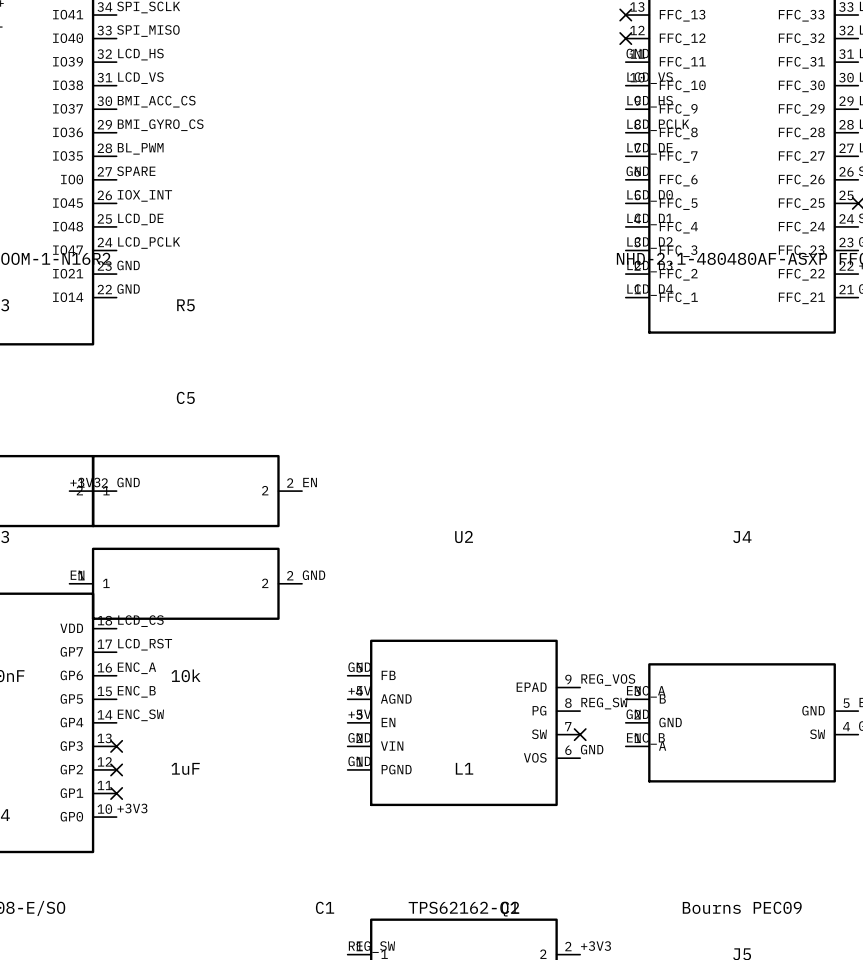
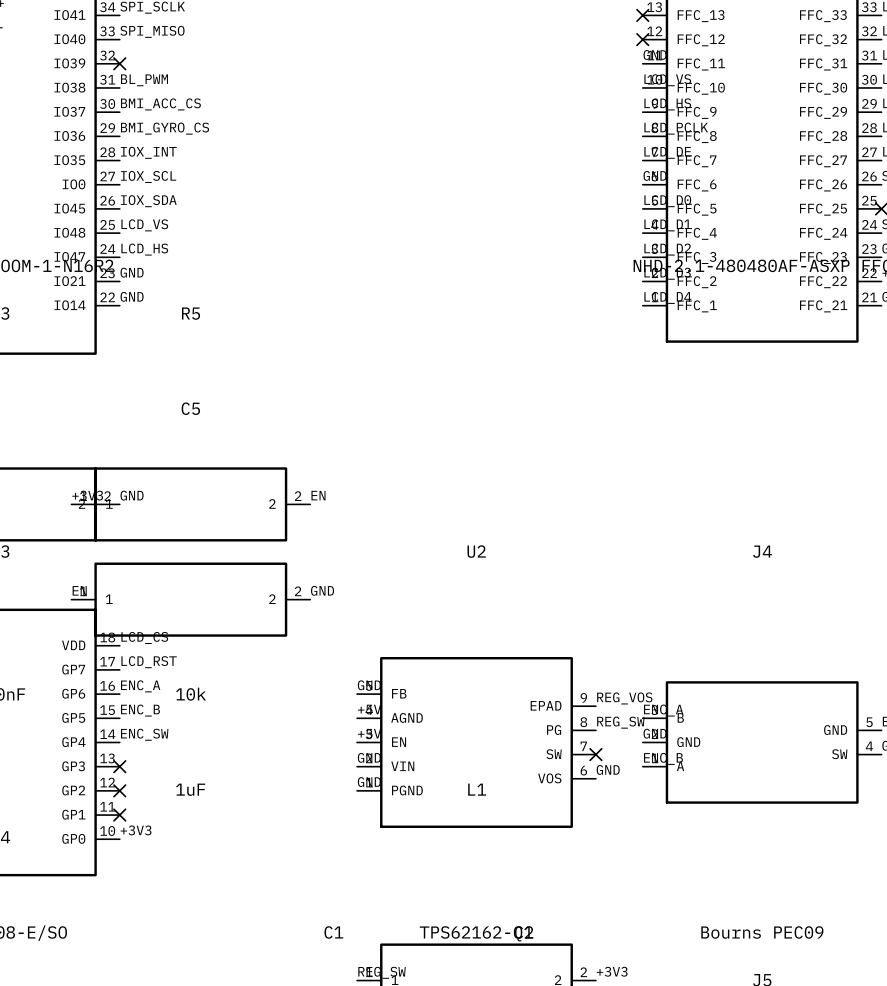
label: LCD_HS (140, 54) -> none
no-connect mark: none -> (119, 63)
label: LCD_VS (140, 78) -> BL_PWM (144, 80)
label: BL_PWM (140, 148) -> IOX_INT (148, 152)
label: SPARE (136, 171) -> IOX_SCL (148, 177)
label: IOX_INT (144, 195) -> IOX_SDA (148, 201)
label: LCD_DE (140, 219) -> LCD_VS (144, 225)
label: LCD_PCLK (149, 242) -> LCD_HS (144, 249)

